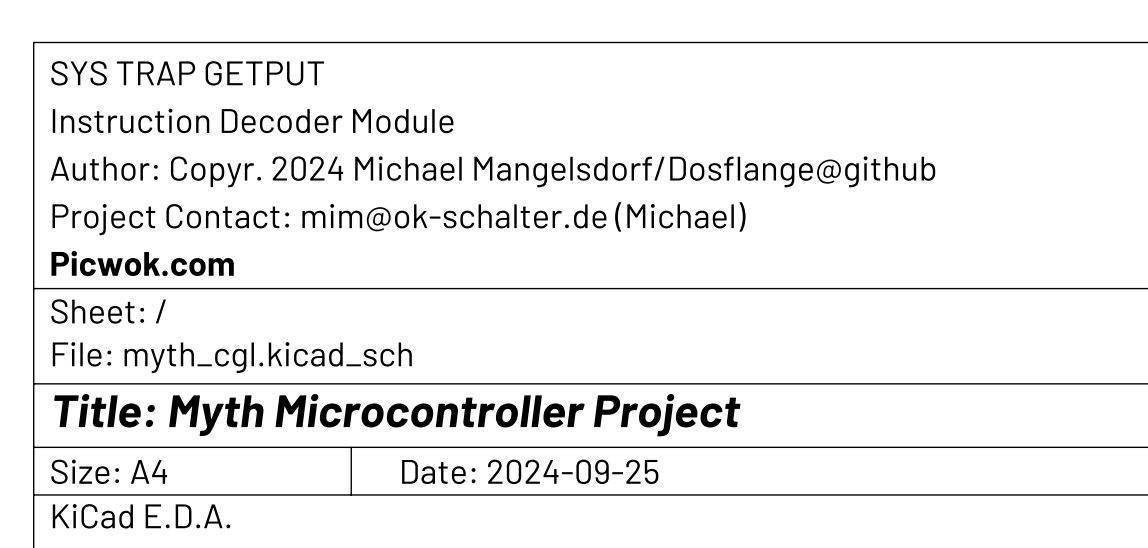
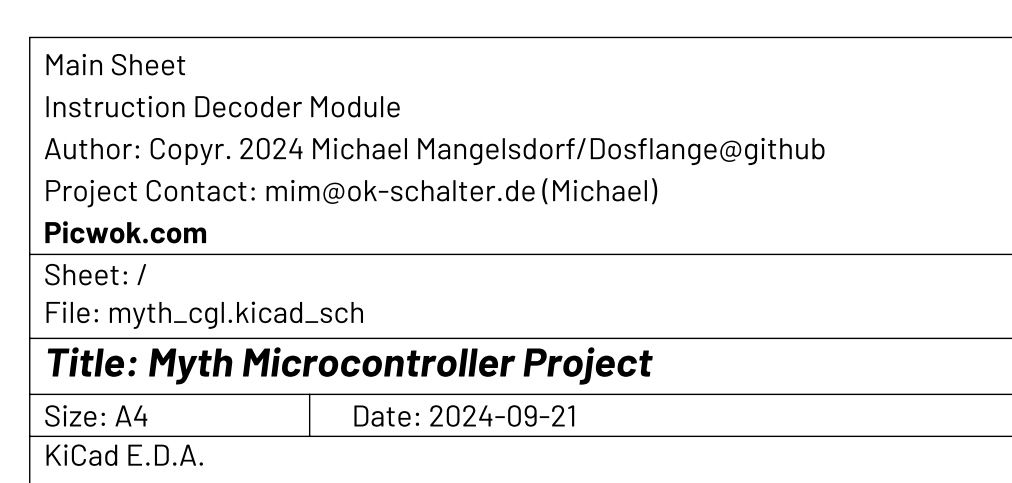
title block: SYS TRAP GETPUT (187, 73) -> Main Sheet (115, 64)
title block: Date: 2024-09-25 (530, 471) -> Date: 2024-09-21 (464, 415)

